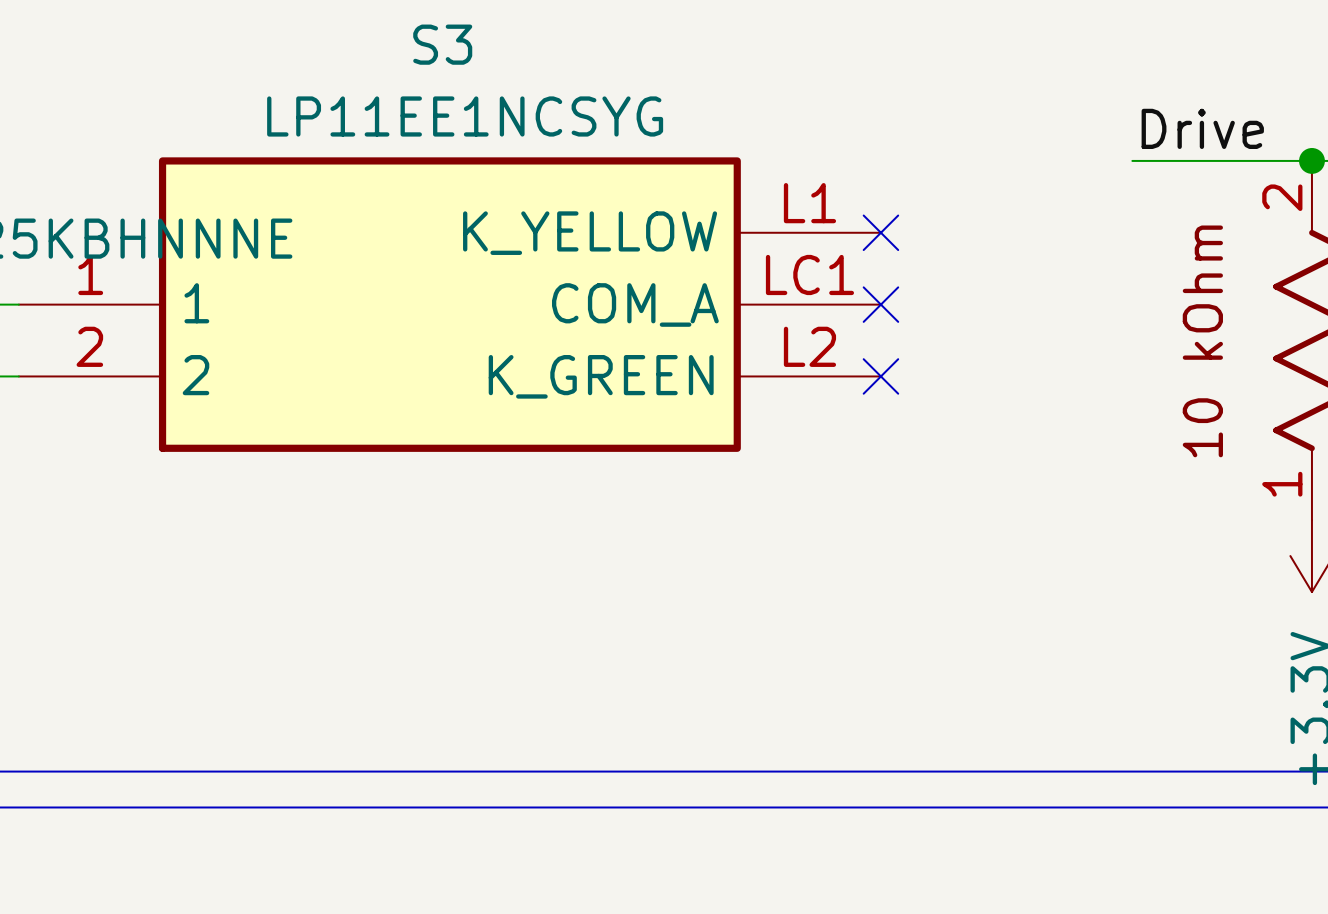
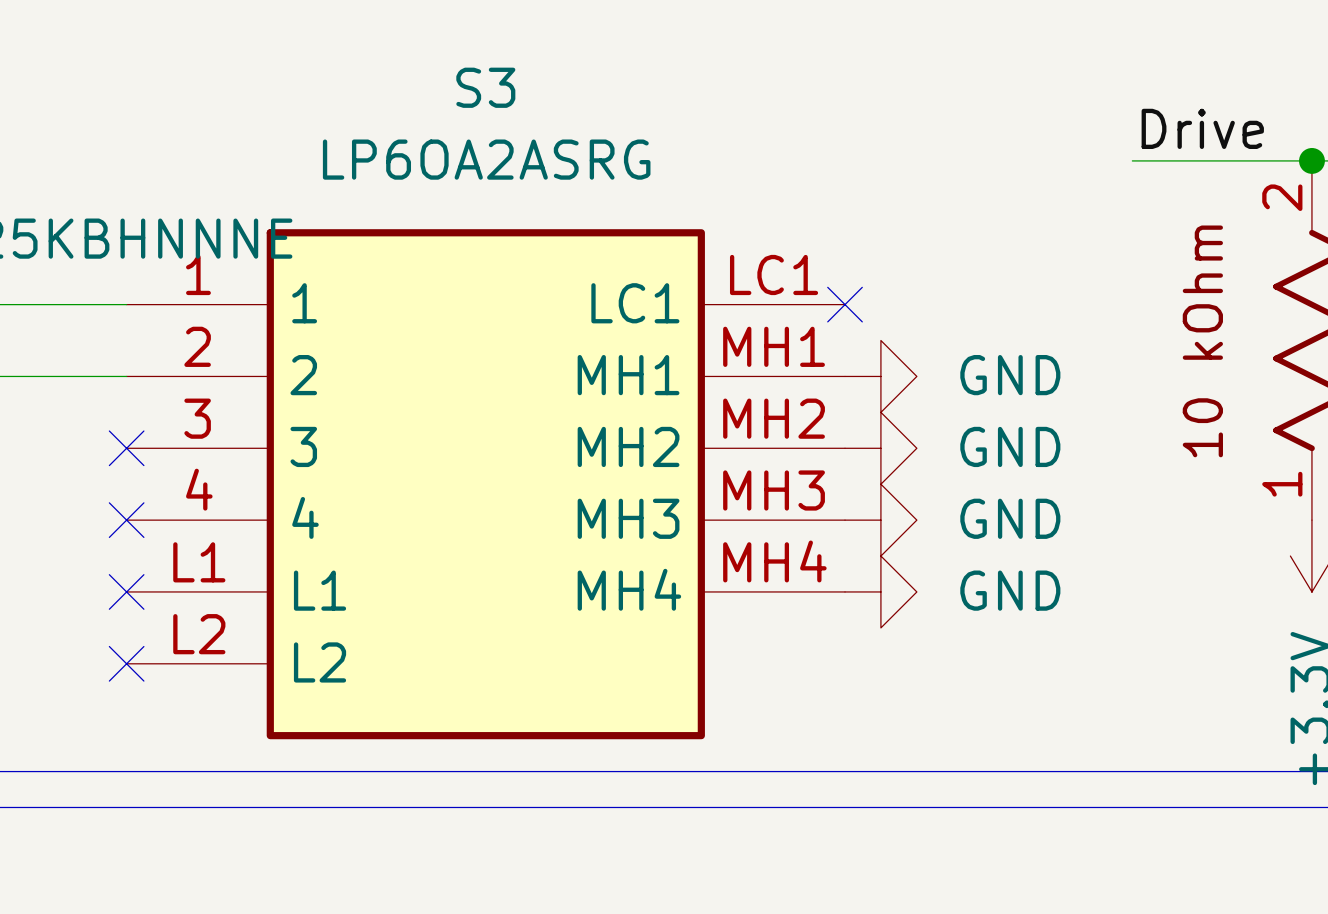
S3 name position: S3 (442, 44) -> S3 (485, 87)
S3 value: LP11EE1NCSYG (465, 116) -> LP6OA2ASRG (486, 159)
S3 symbol: [18, 157, 881, 452] -> [126, 229, 846, 740]
no-connect mark: (880, 232) -> none
no-connect mark position: (880, 304) -> (845, 304)
no-connect mark: (880, 376) -> none
power symbol: none -> GND (880, 376)
no-connect mark: none -> (126, 448)
power symbol: none -> GND (880, 448)
no-connect mark: none -> (126, 520)
power symbol: none -> GND (880, 520)
no-connect mark: none -> (126, 591)
power symbol: none -> GND (880, 591)
no-connect mark: none -> (126, 663)

